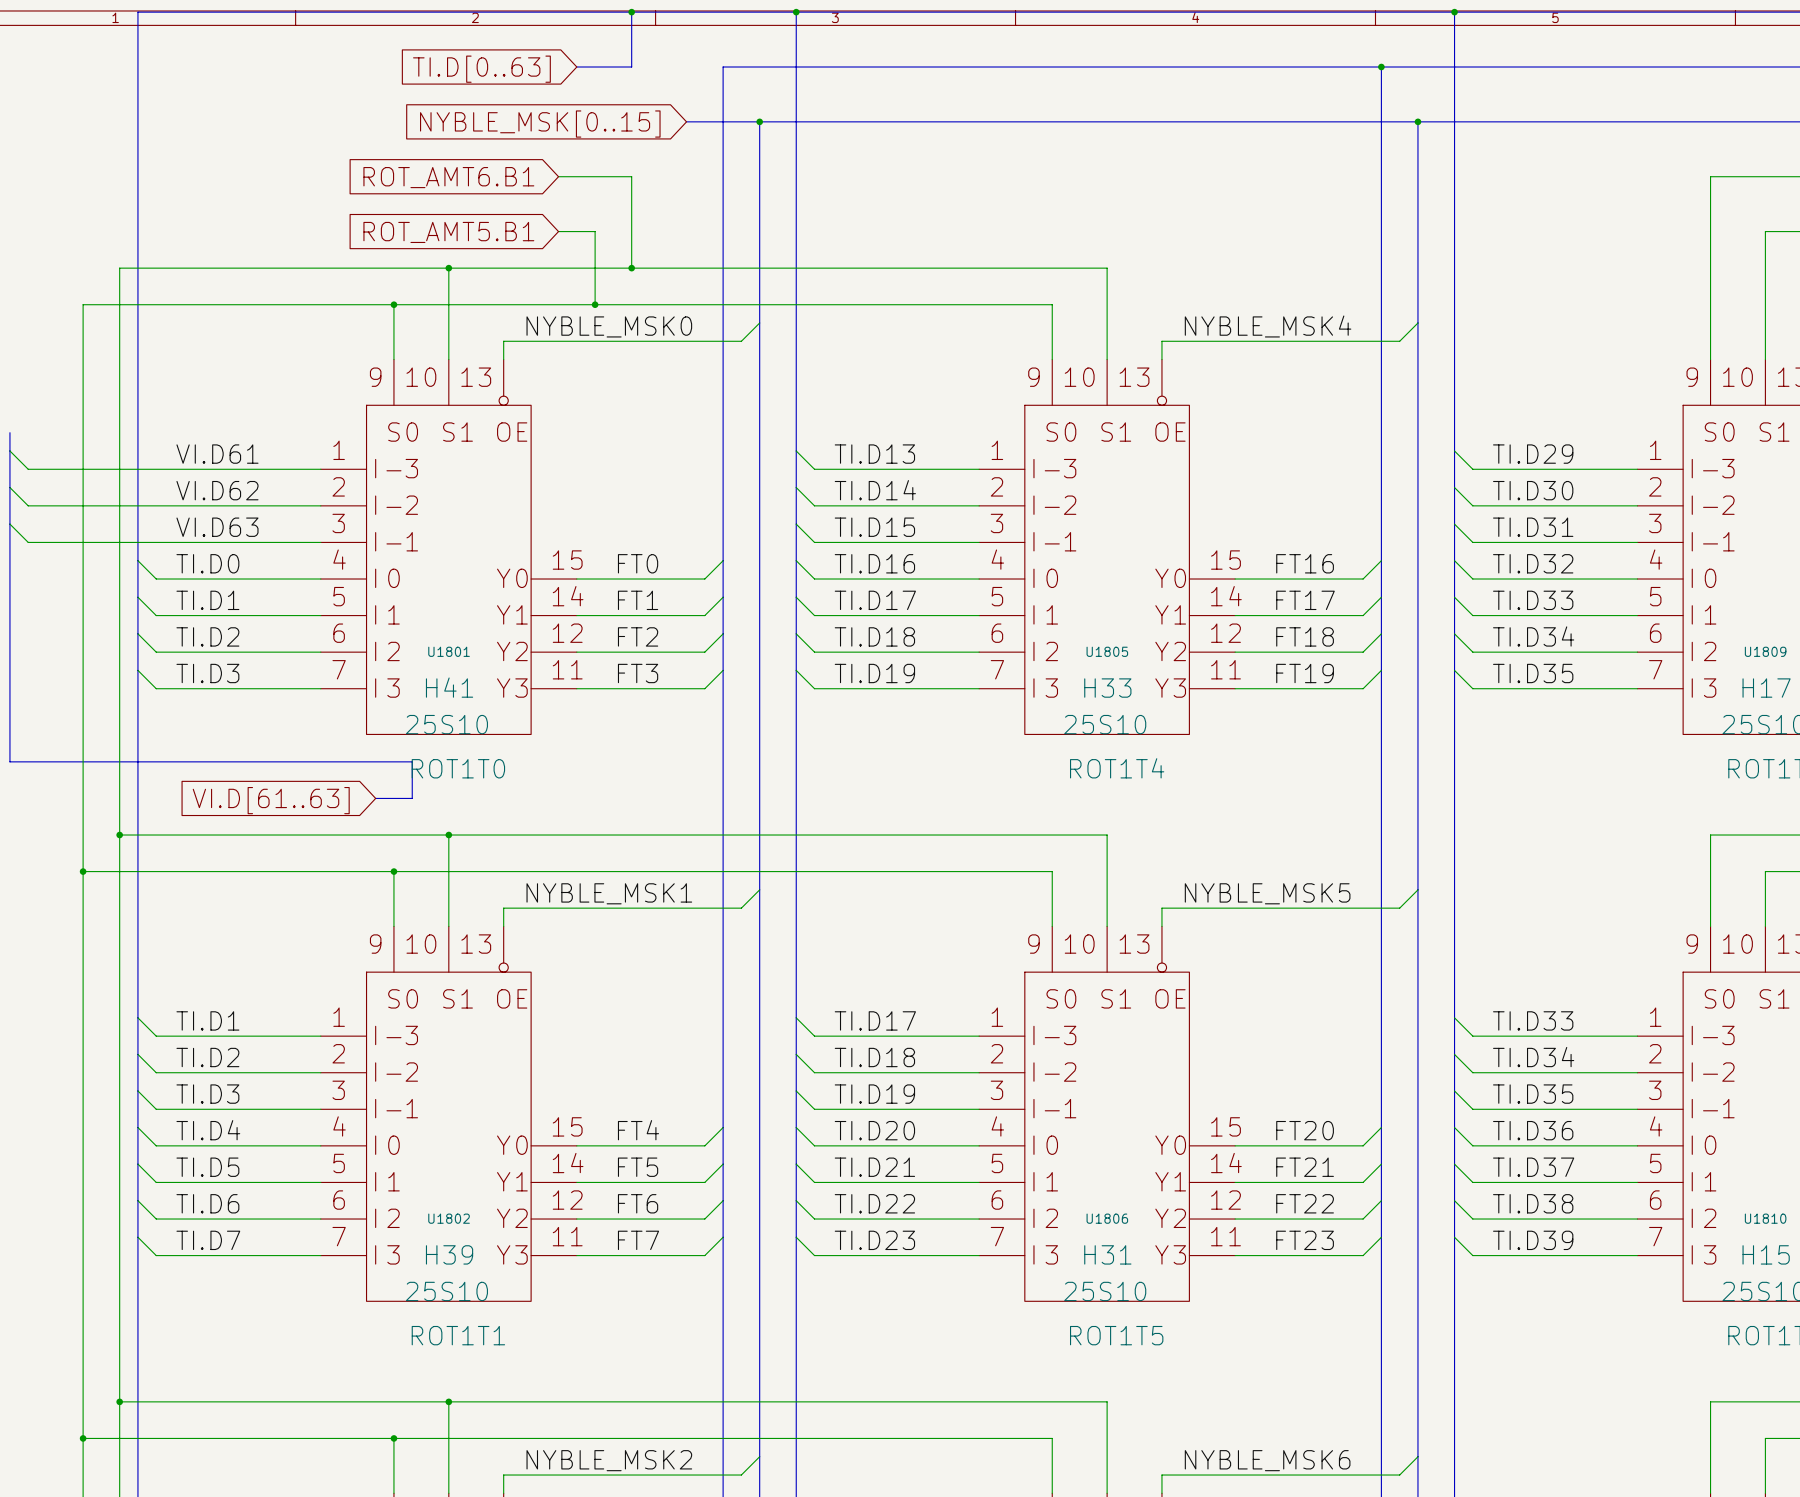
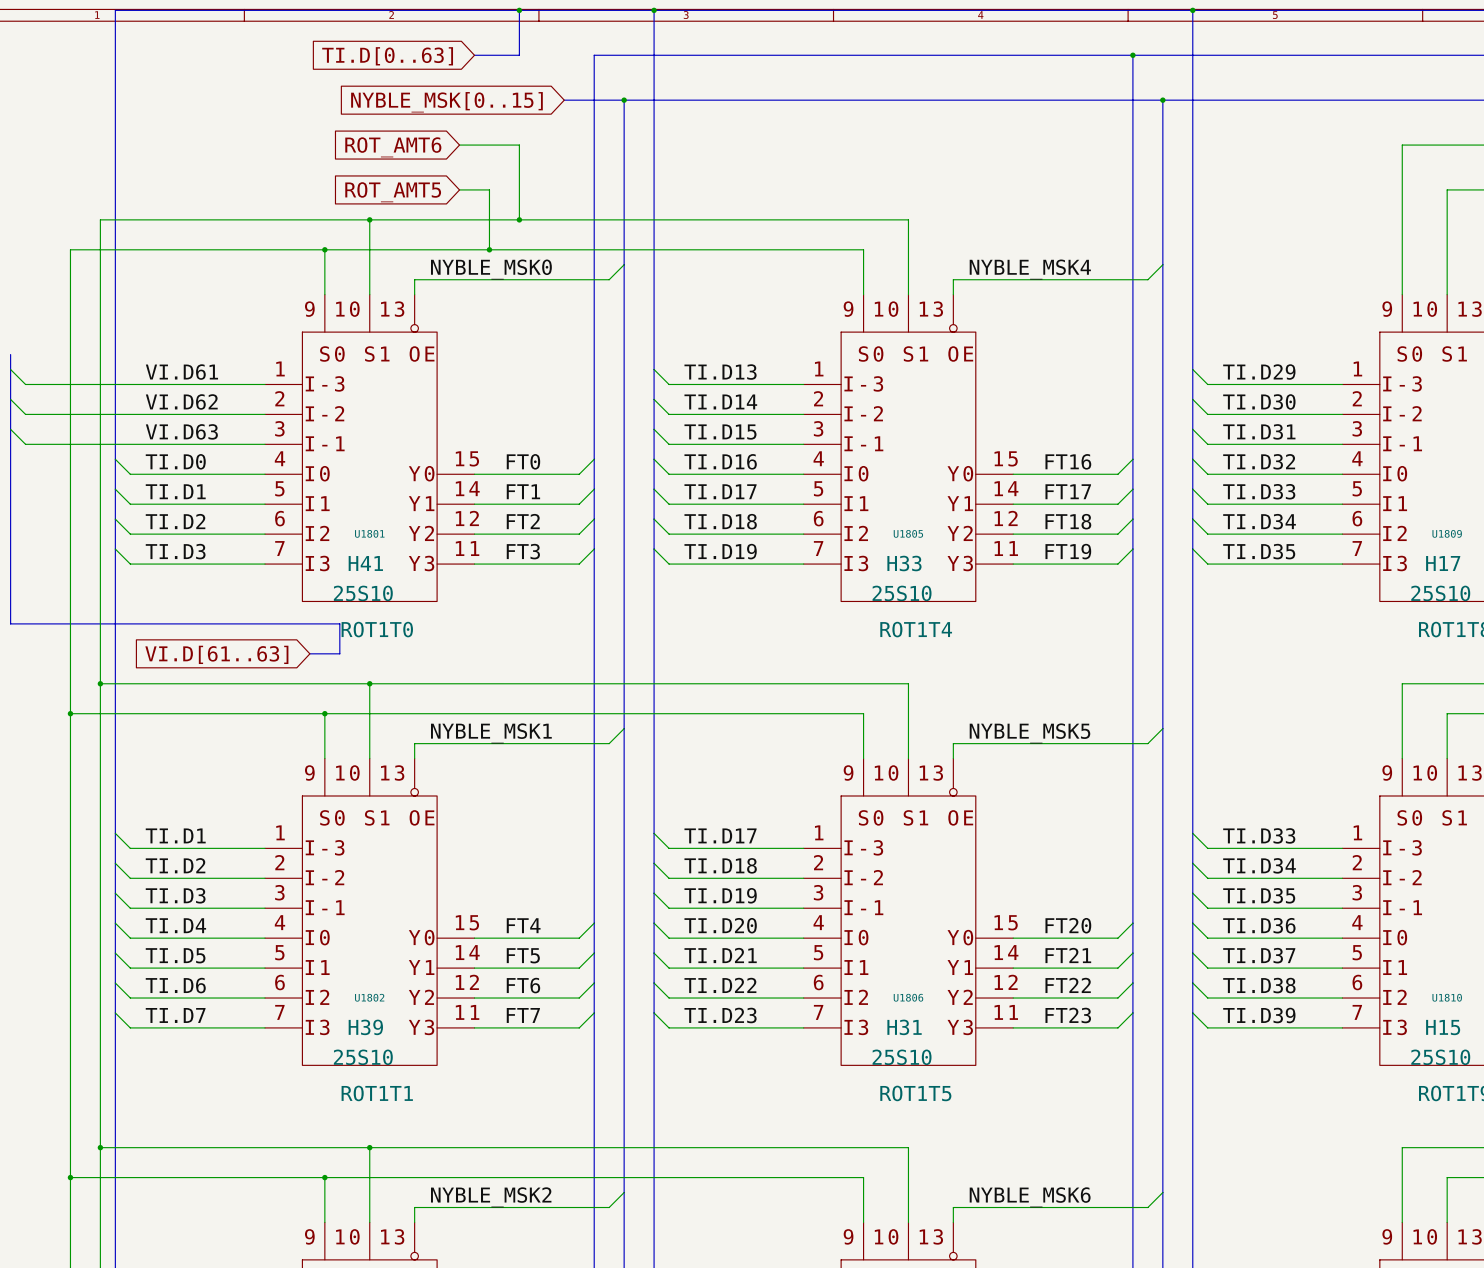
global label: ROT_AMT6.B1 (448, 177) -> ROT_AMT6 (393, 147)
global label: ROT_AMT5.B1 (448, 232) -> ROT_AMT5 (393, 192)

